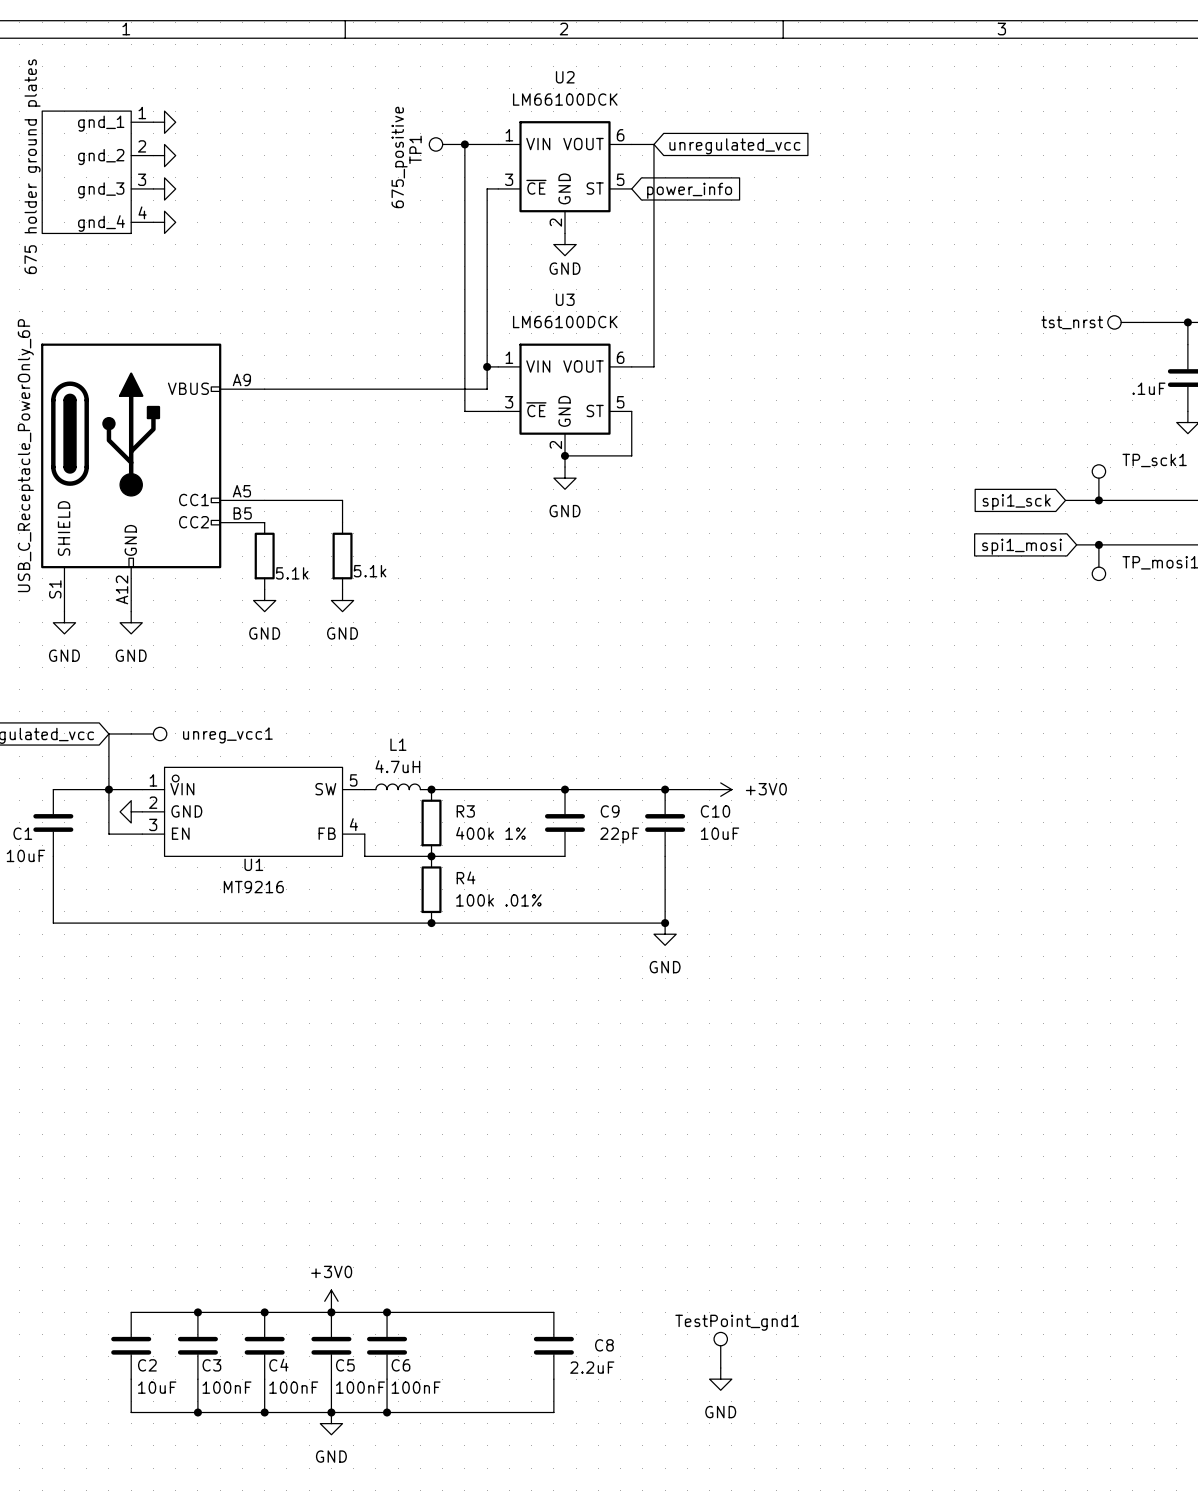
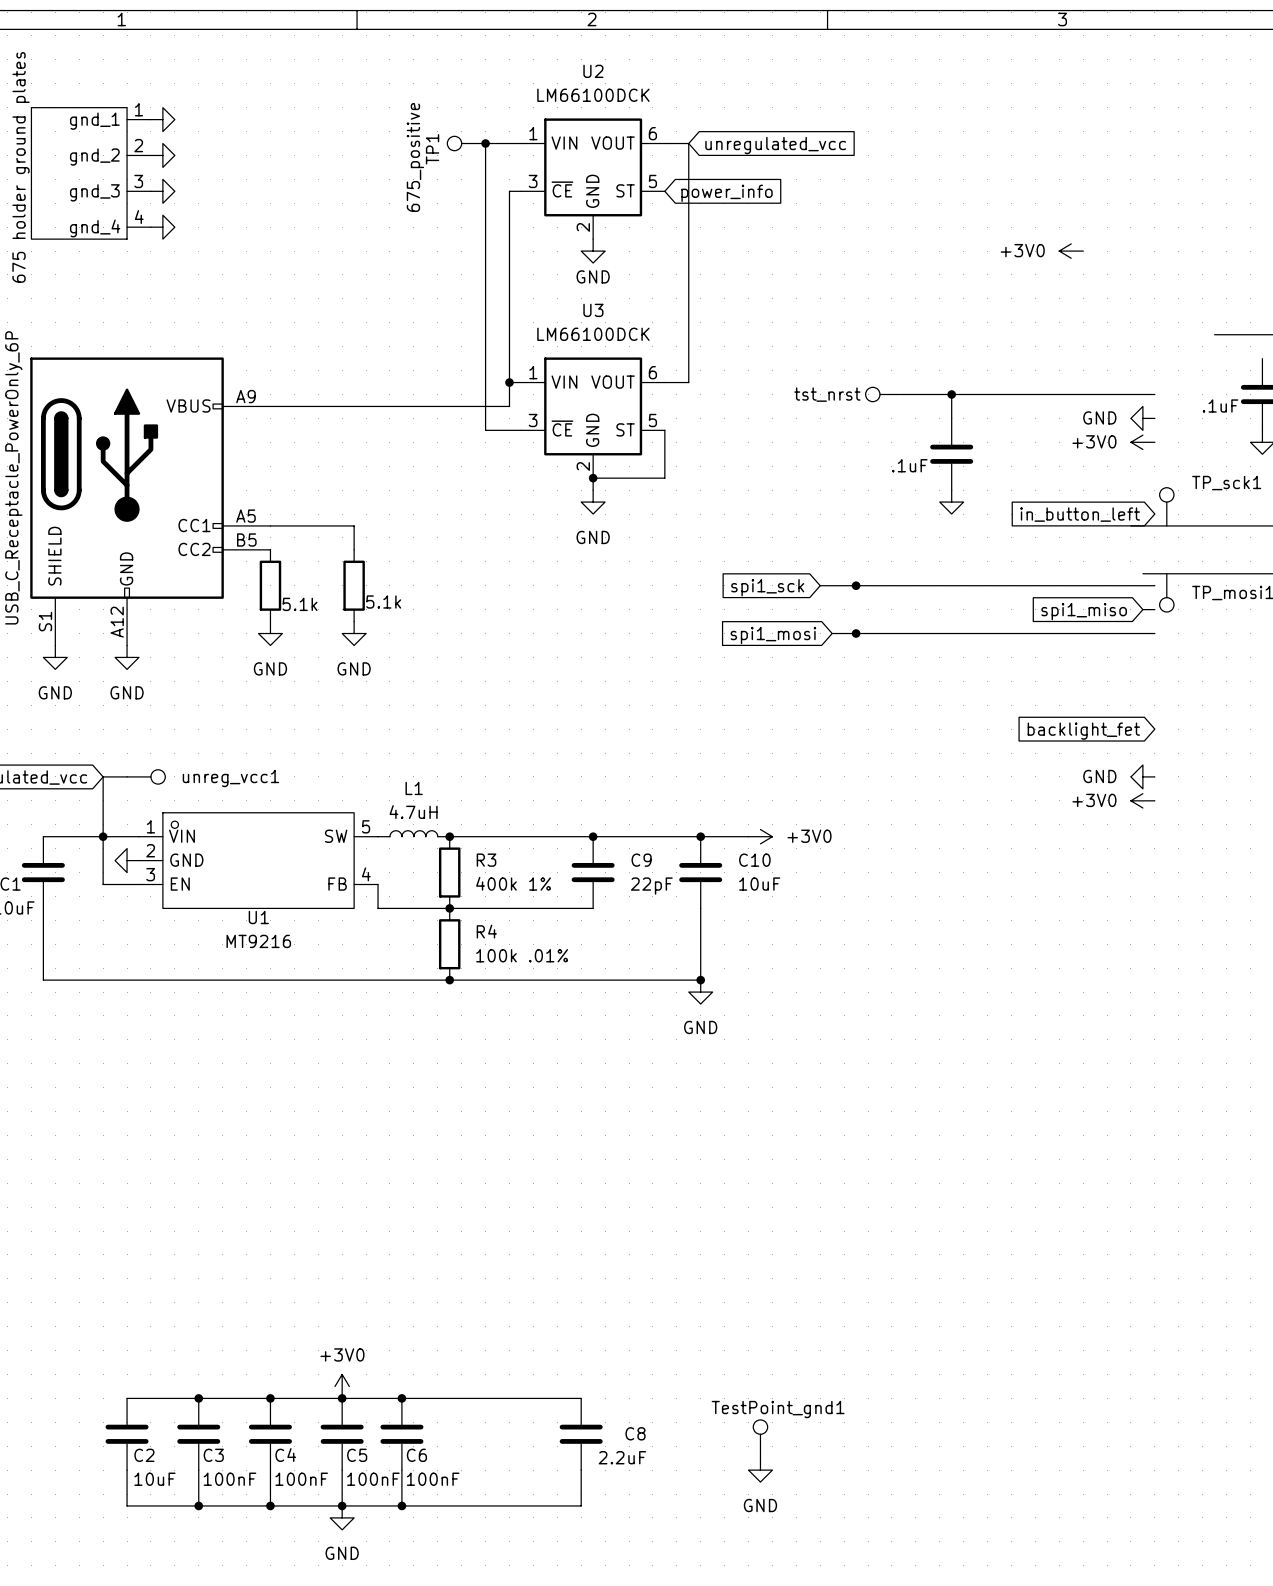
power symbol: none -> +3V0 (1071, 251)
part: tst_nrst (1125, 322) -> none
wire: (1187, 322) (1187, 344) -> none
junction: (1187, 322) -> none
part: none -> tst_nrst (884, 394)
wire: none -> (903, 394) (1154, 394)
wire: none -> (951, 394) (951, 418)
junction: none -> (951, 394)
power symbol: none -> GND (1142, 418)
power symbol: none -> +3V0 (1142, 442)
part: none -> .1uF (951, 454)
power symbol: none -> (951, 502)
global label: none -> in_button_left (1080, 514)
junction: (1098, 500) -> none
global label: spi1_sck (1016, 502) -> none
junction: (1098, 544) -> none
global label: spi1_mosi (1021, 546) -> none
wire: none -> (820, 585) (1154, 585)
junction: none -> (856, 585)
global label: none -> spi1_sck (767, 587)
wire: none -> (1142, 609) (1154, 609)
global label: none -> spi1_miso (1084, 611)
wire: none -> (832, 633) (1154, 633)
junction: none -> (856, 633)
global label: none -> spi1_mosi (773, 635)
global label: none -> backlight_fet (1083, 731)
power symbol: none -> GND (1142, 776)
power symbol: none -> +3V0 (1142, 800)

